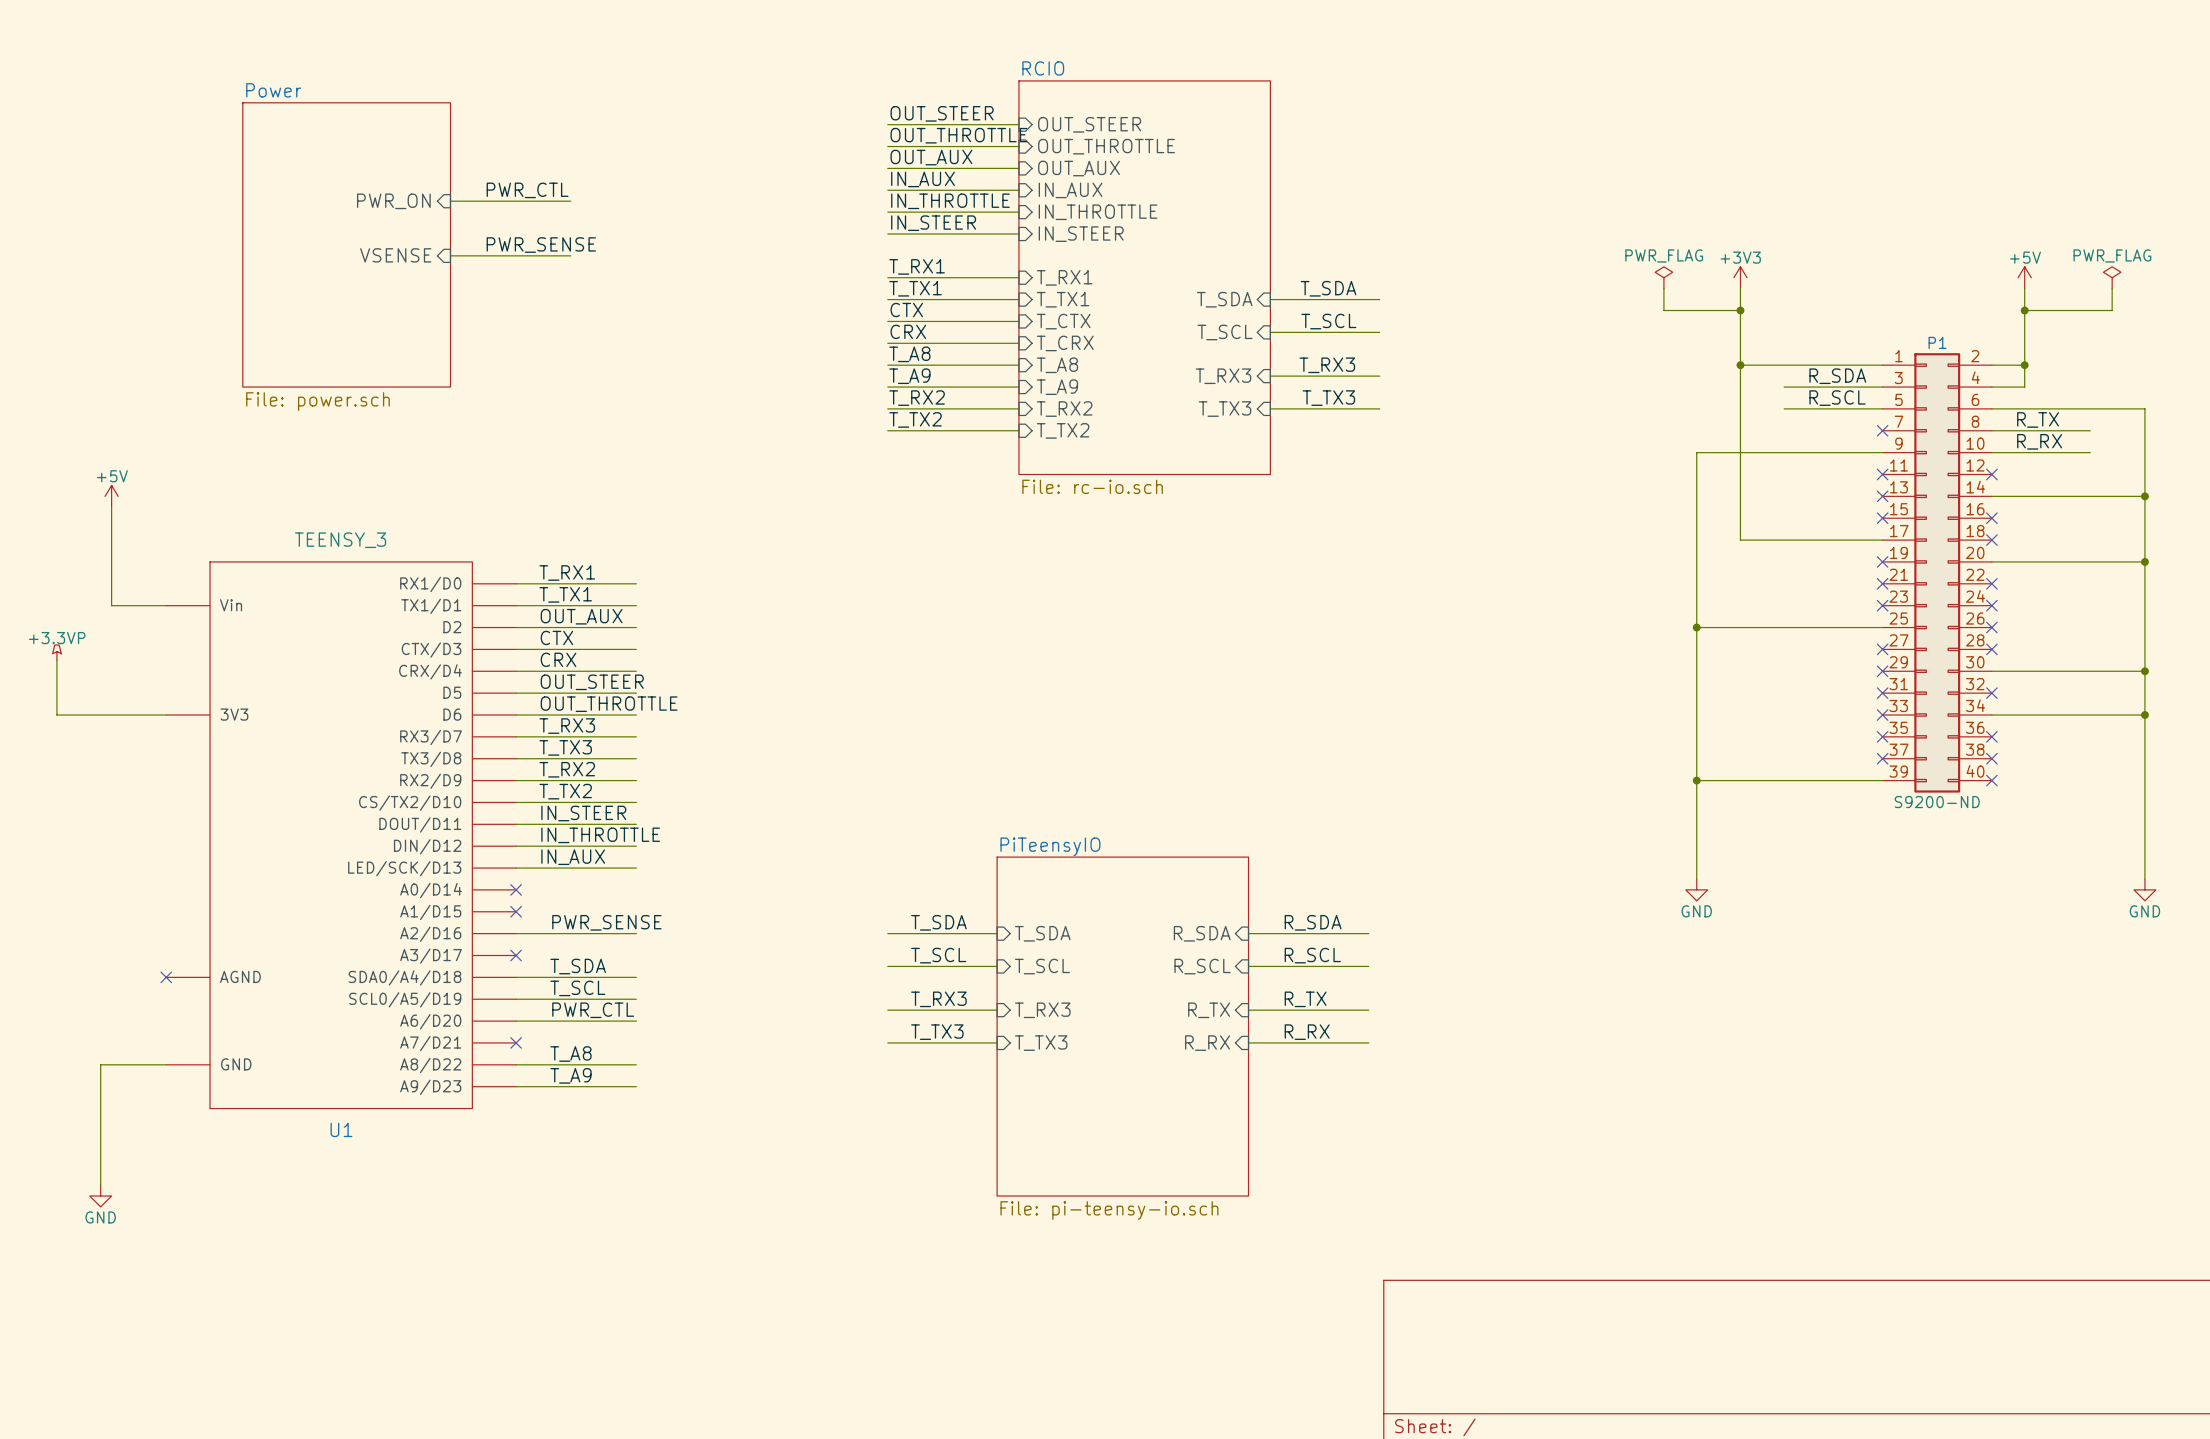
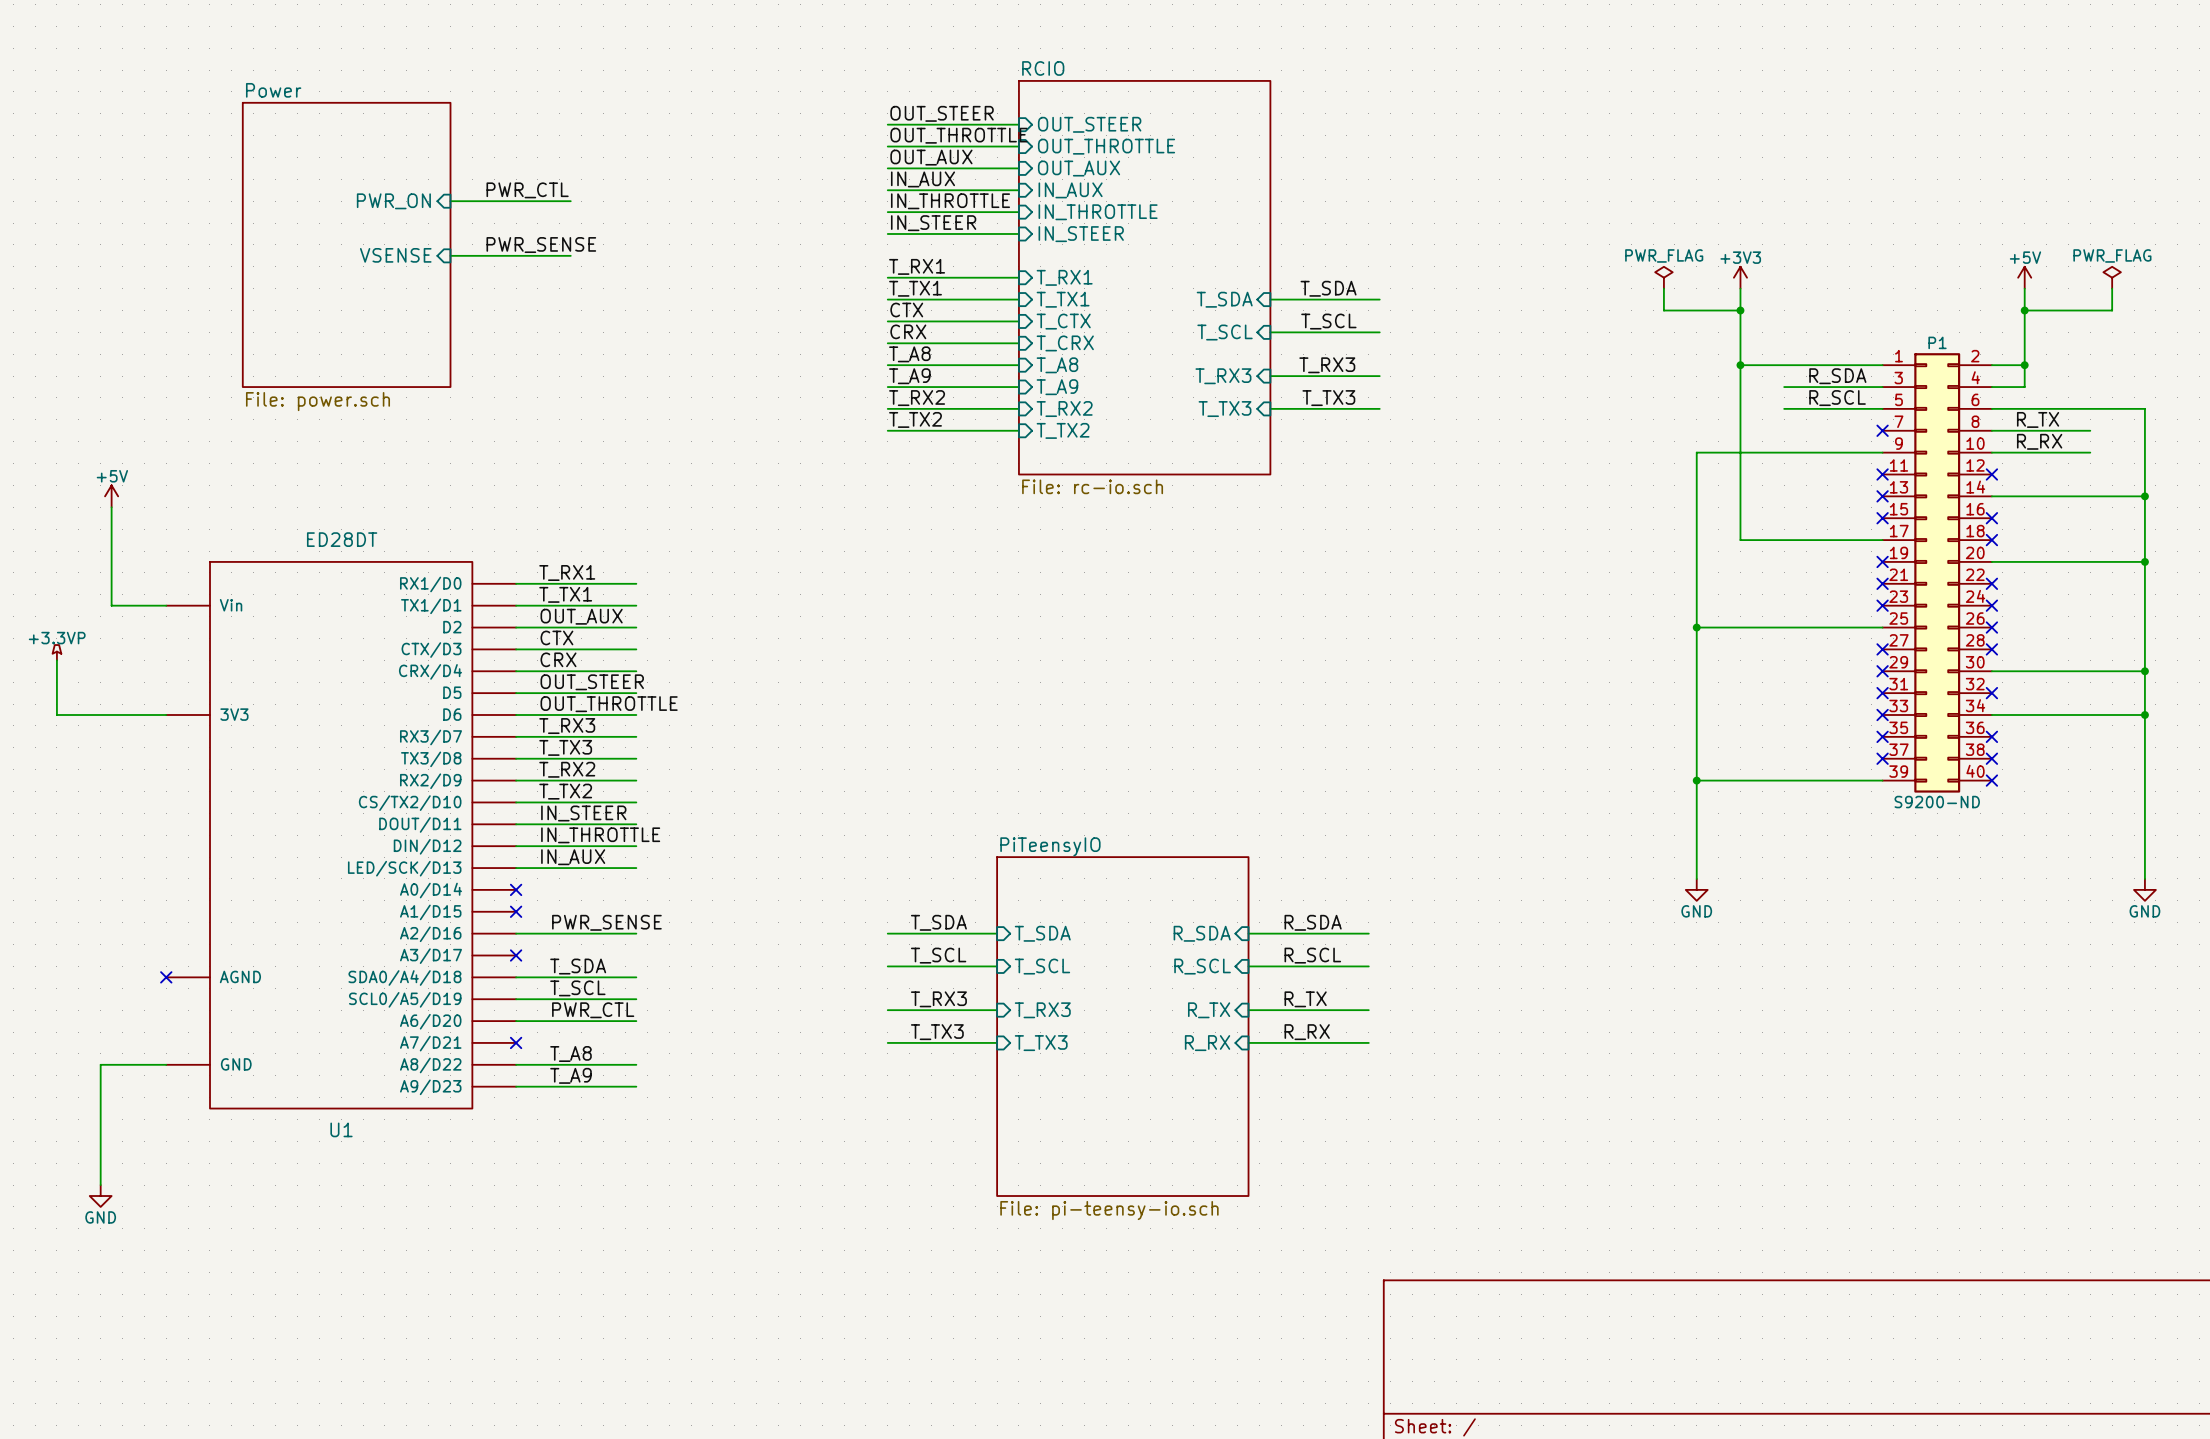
U1 value: TEENSY_3 (340, 540) -> ED28DT (342, 539)

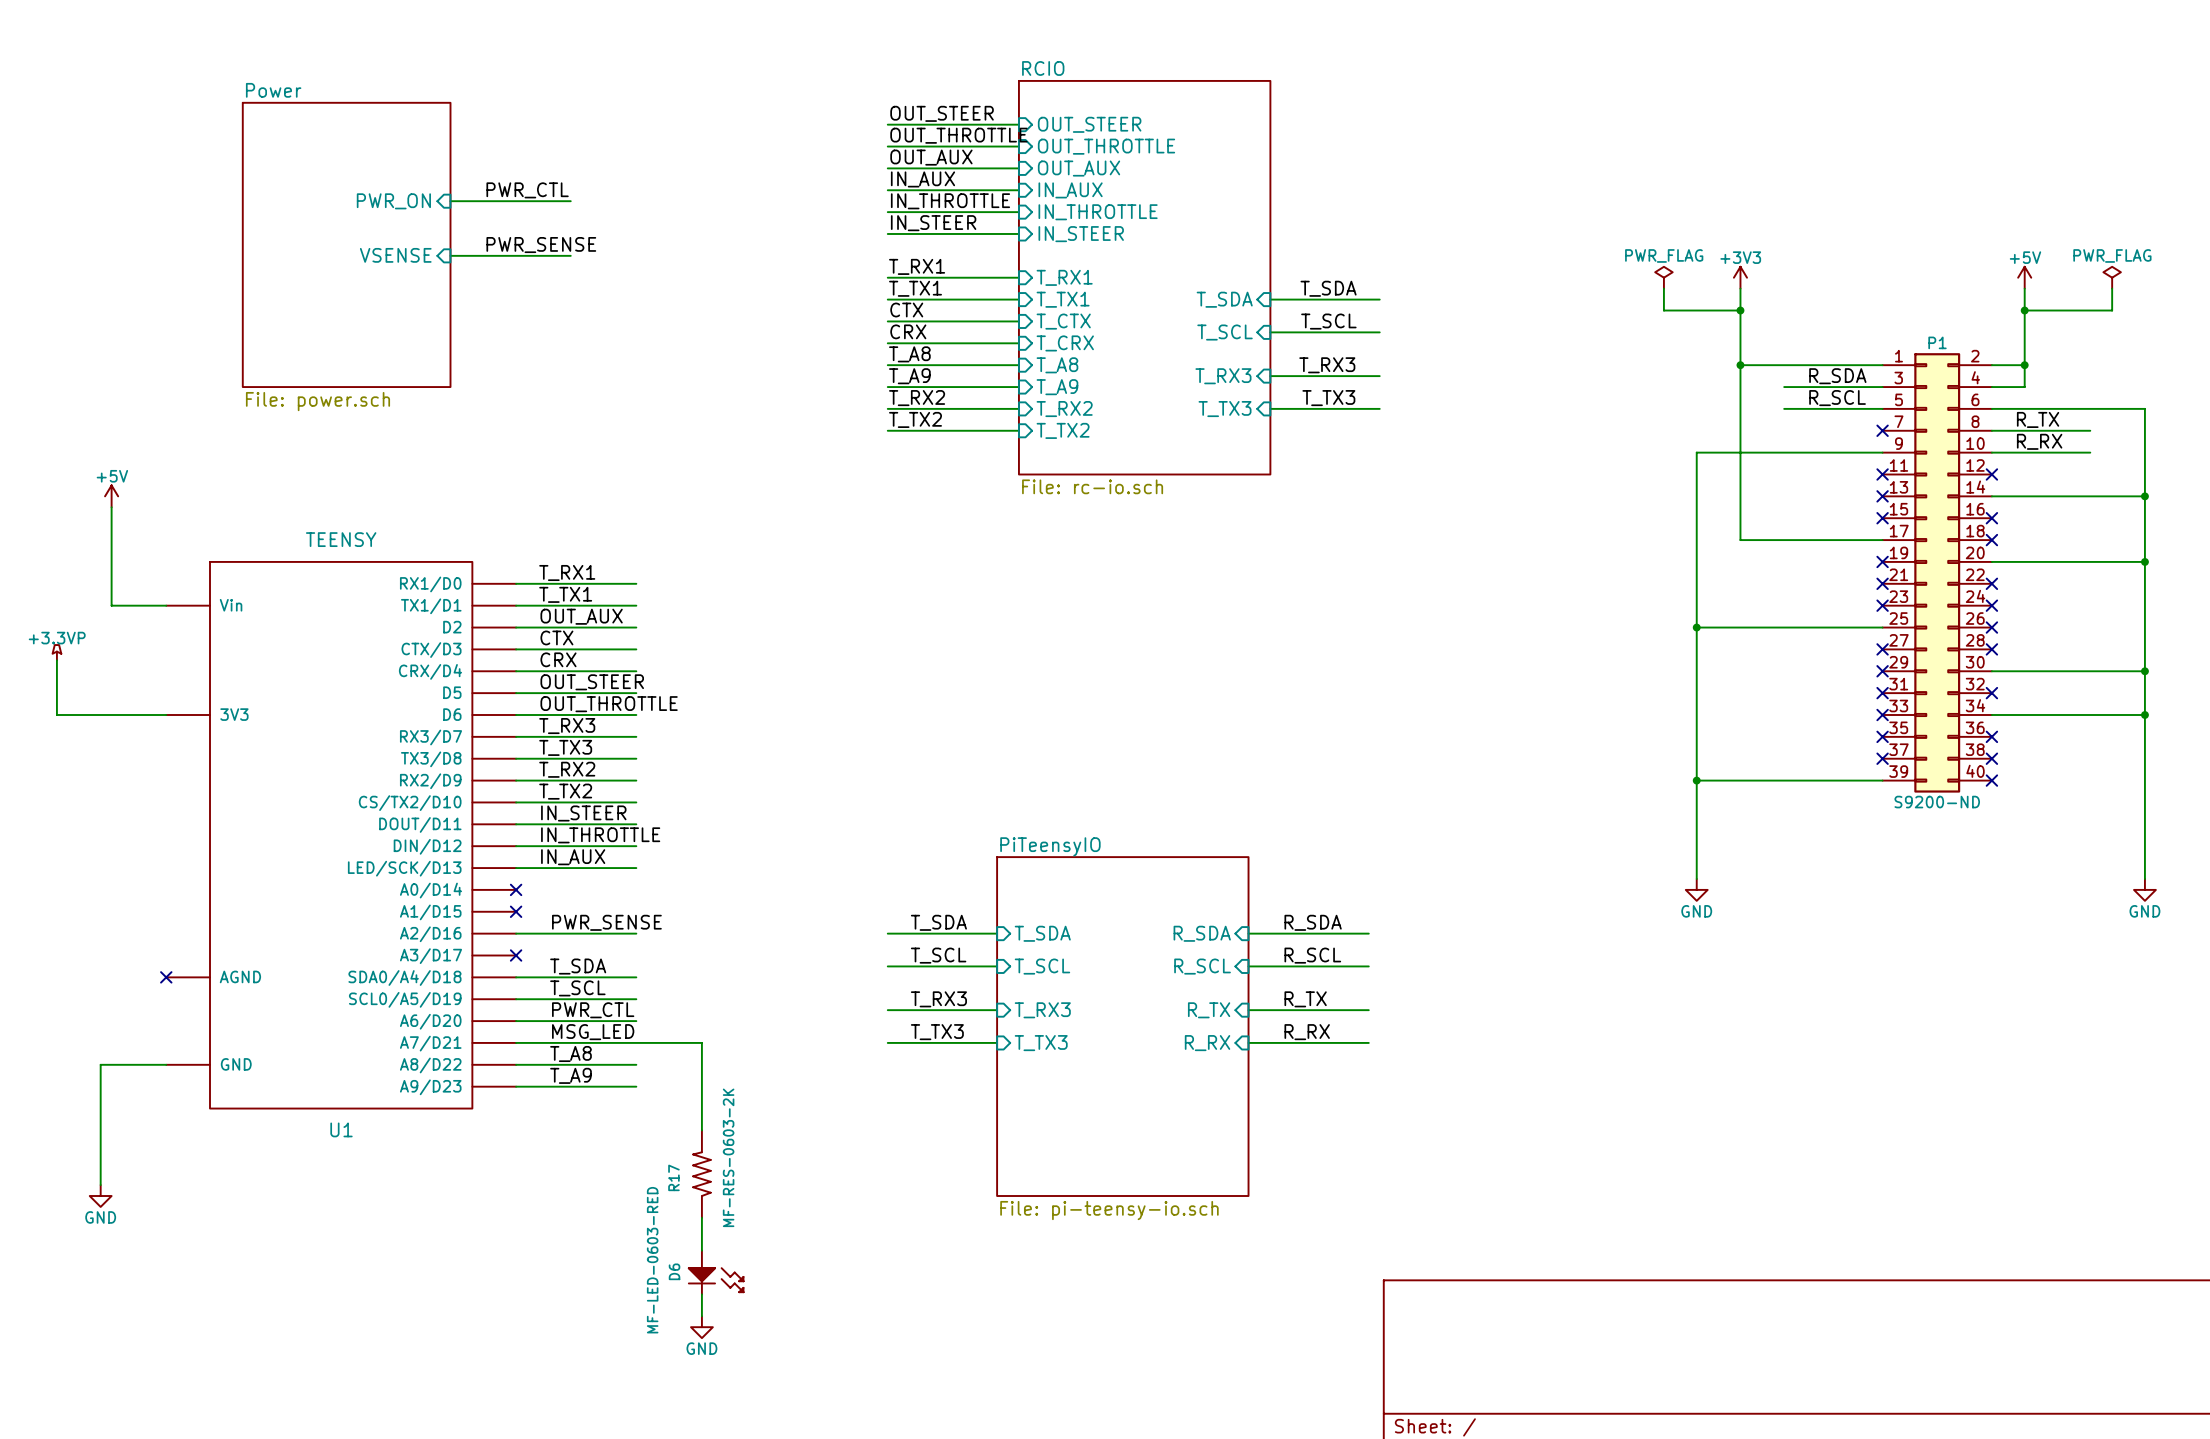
U1 value: ED28DT (342, 539) -> TEENSY (341, 539)
label: none -> MSG_LED (593, 1032)
wire: none -> (516, 1042) (701, 1042) (701, 1130)
no-connect mark: (516, 1042) -> none
R17: none -> MF-RES-0603-2K (701, 1174)
wire: none -> (701, 1217) (701, 1250)
D6: none -> MF-LED-0603-RED (716, 1272)
wire: none -> (701, 1294) (701, 1316)
power symbol: none -> GND (701, 1327)

